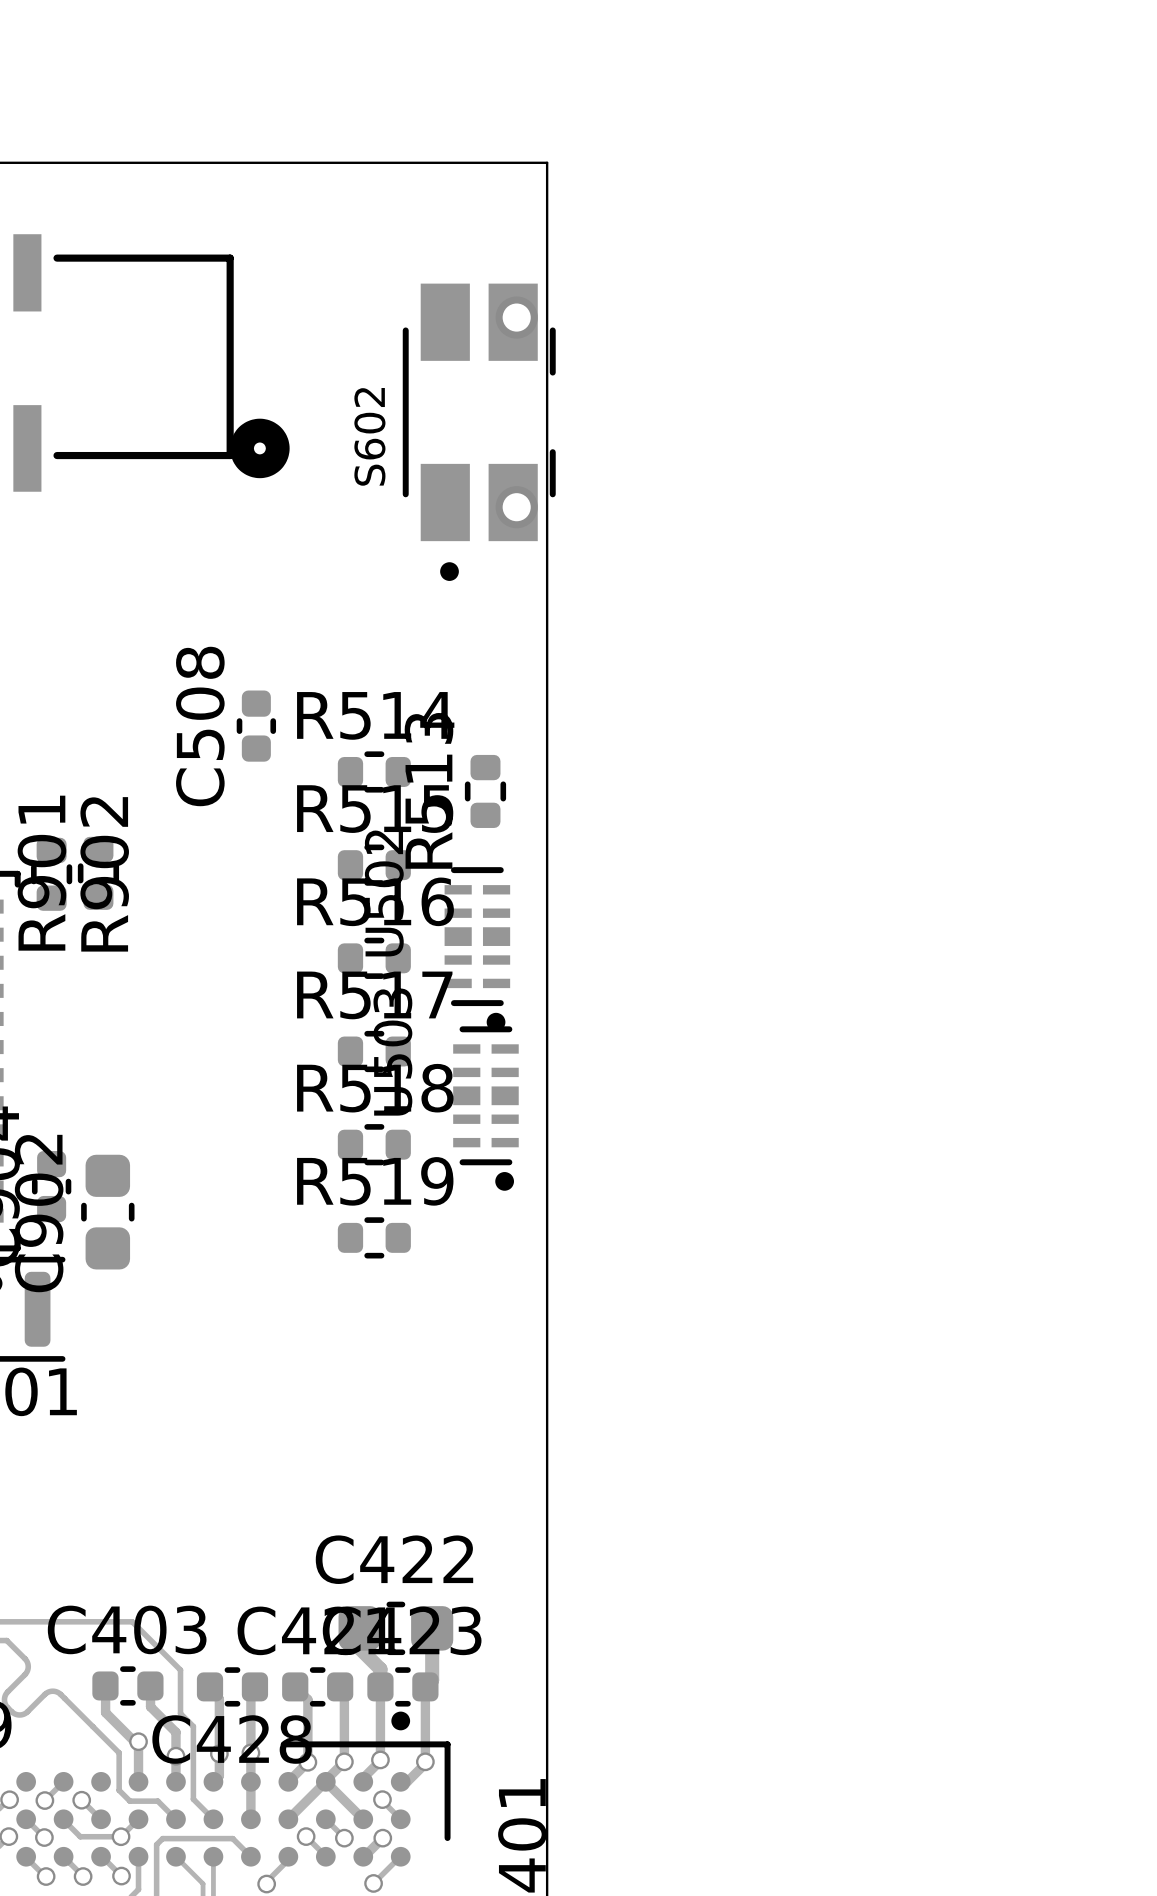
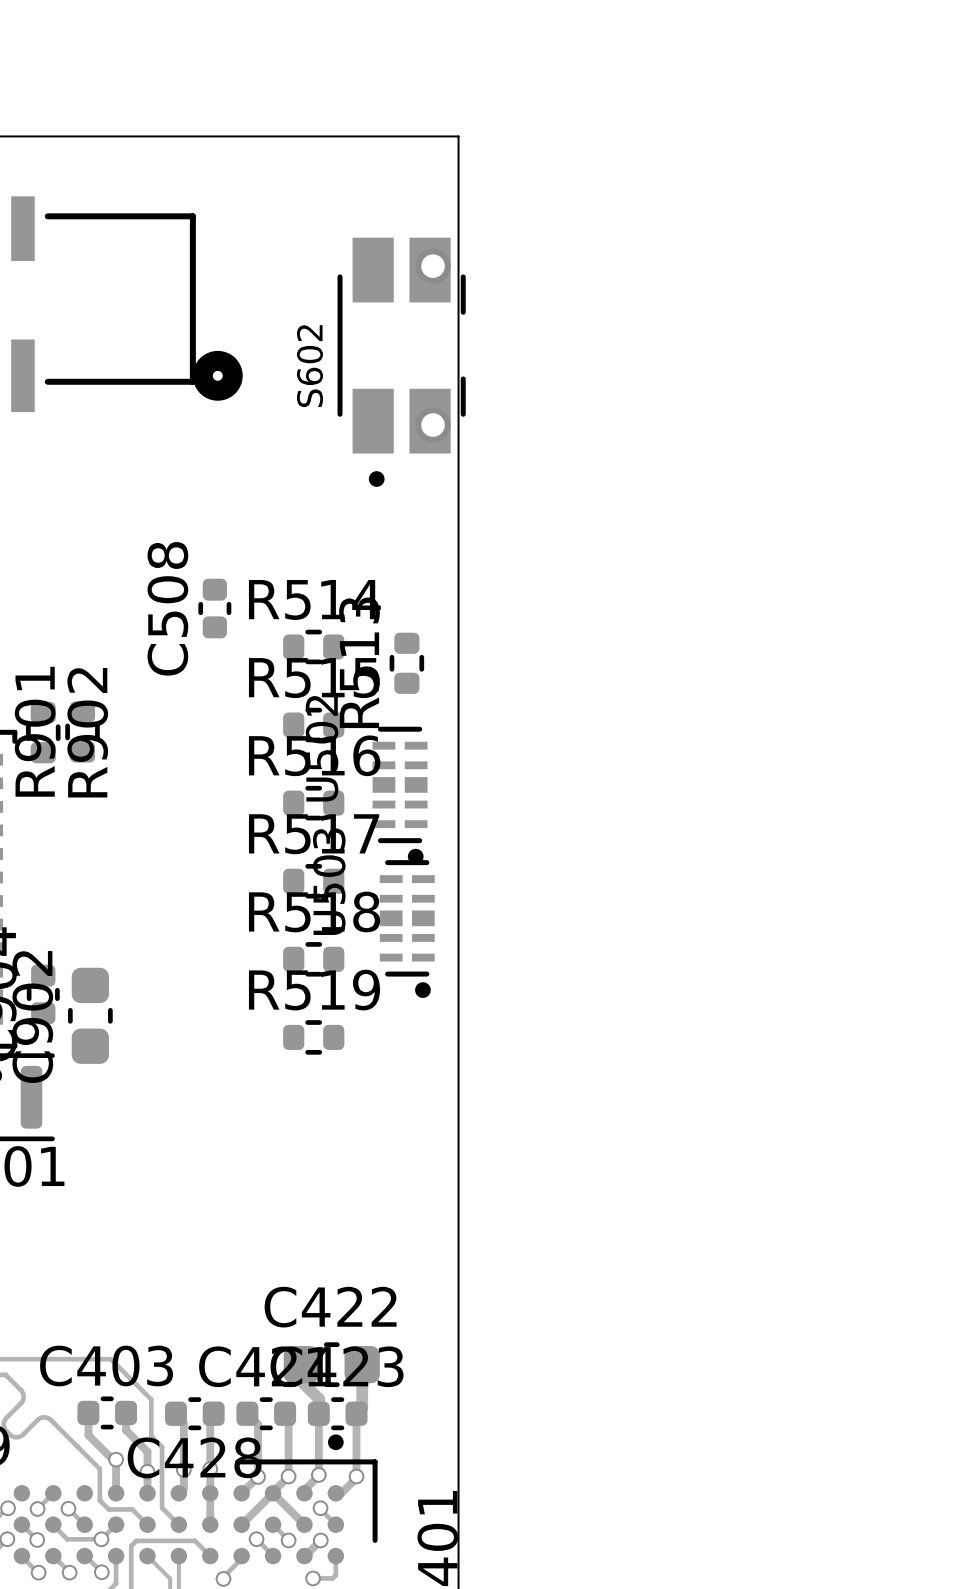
track: (400, 1856) (373, 1883) -> (335, 1556) (335, 1575) (332, 1578) (313, 1578)

